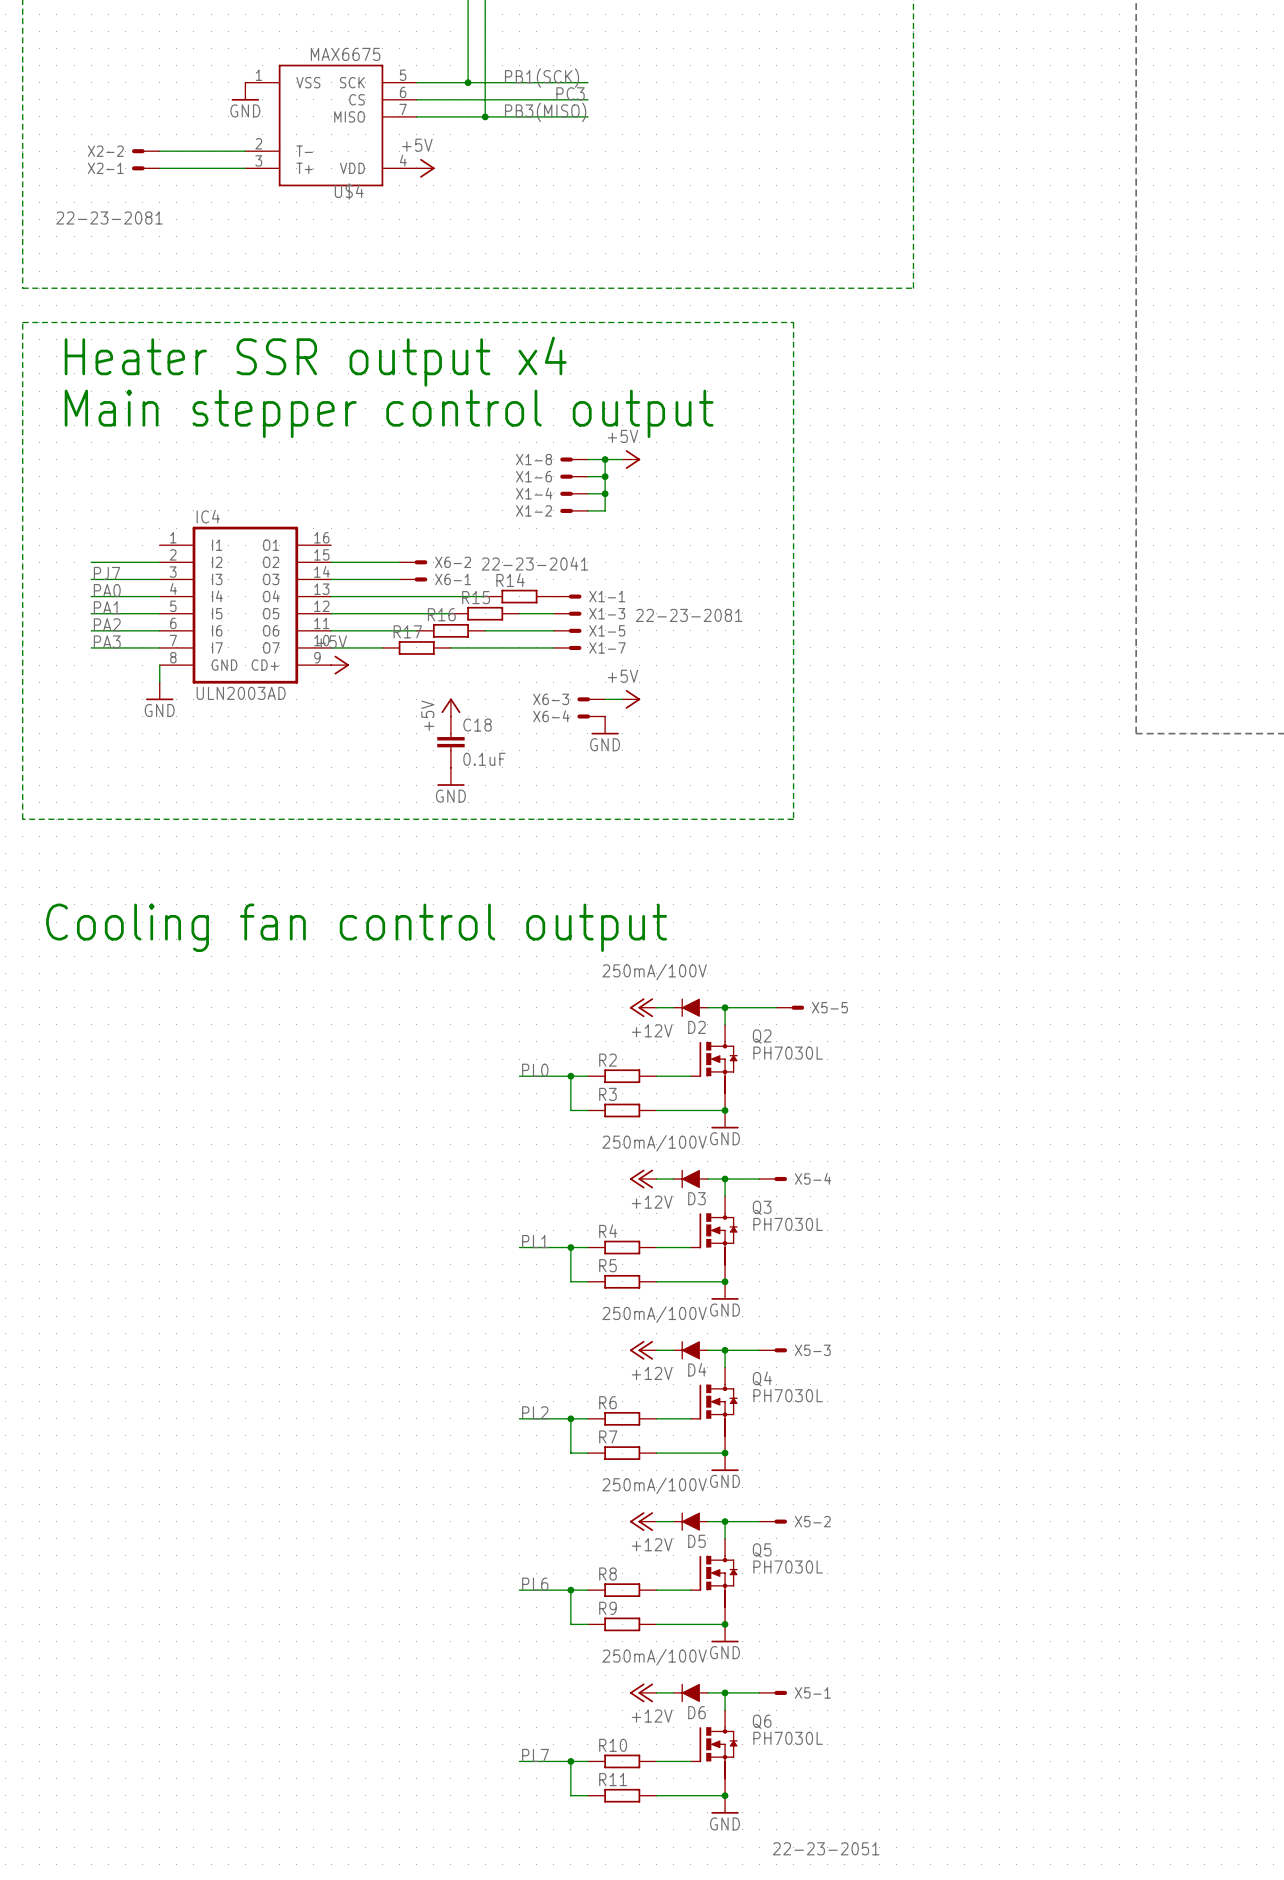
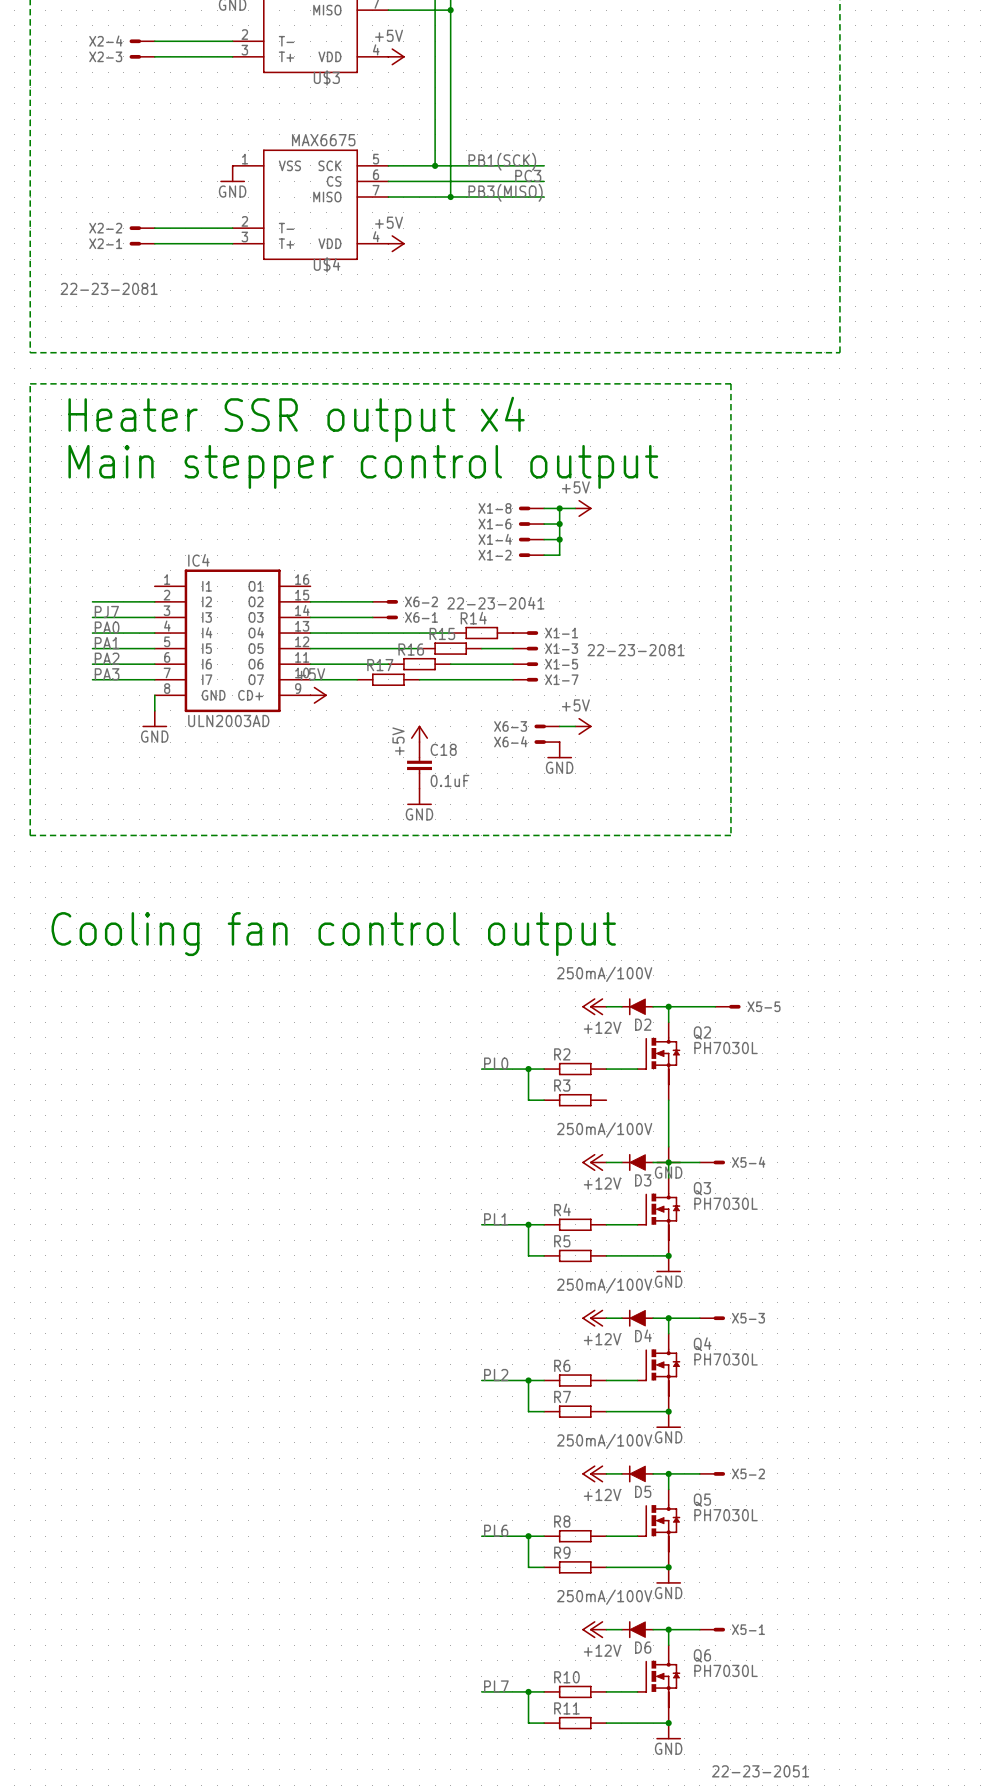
wire: (656, 1110) (725, 1110) -> (668, 1146) (668, 1100)
junction: (725, 1110) -> none
power symbol position: GND (725, 1119) -> GND (668, 1155)

